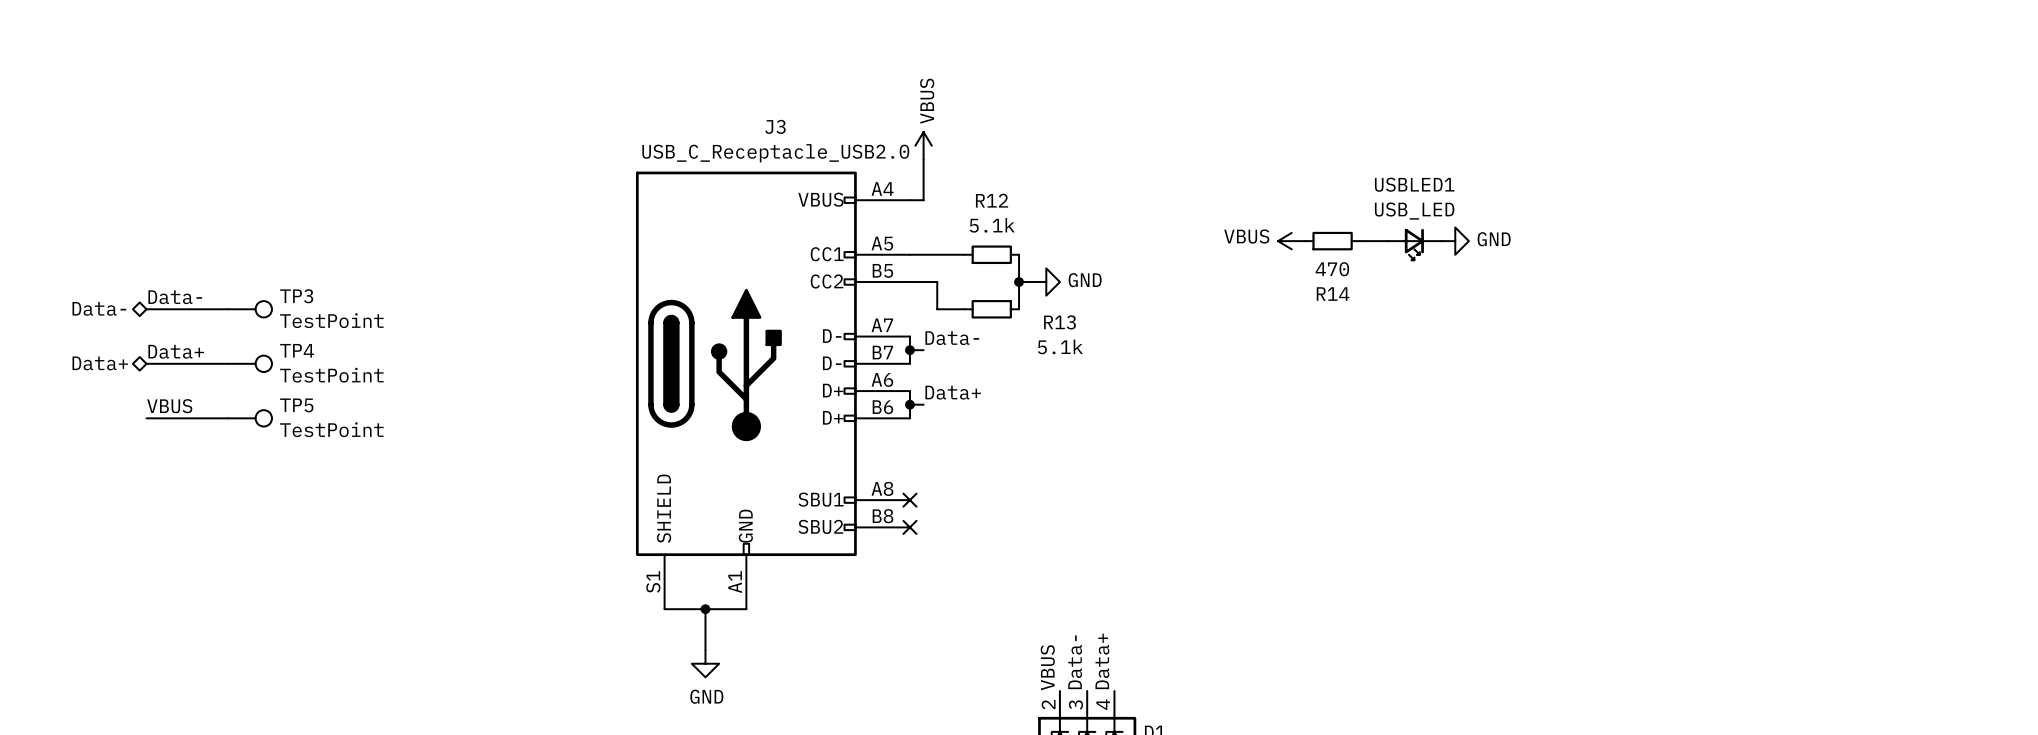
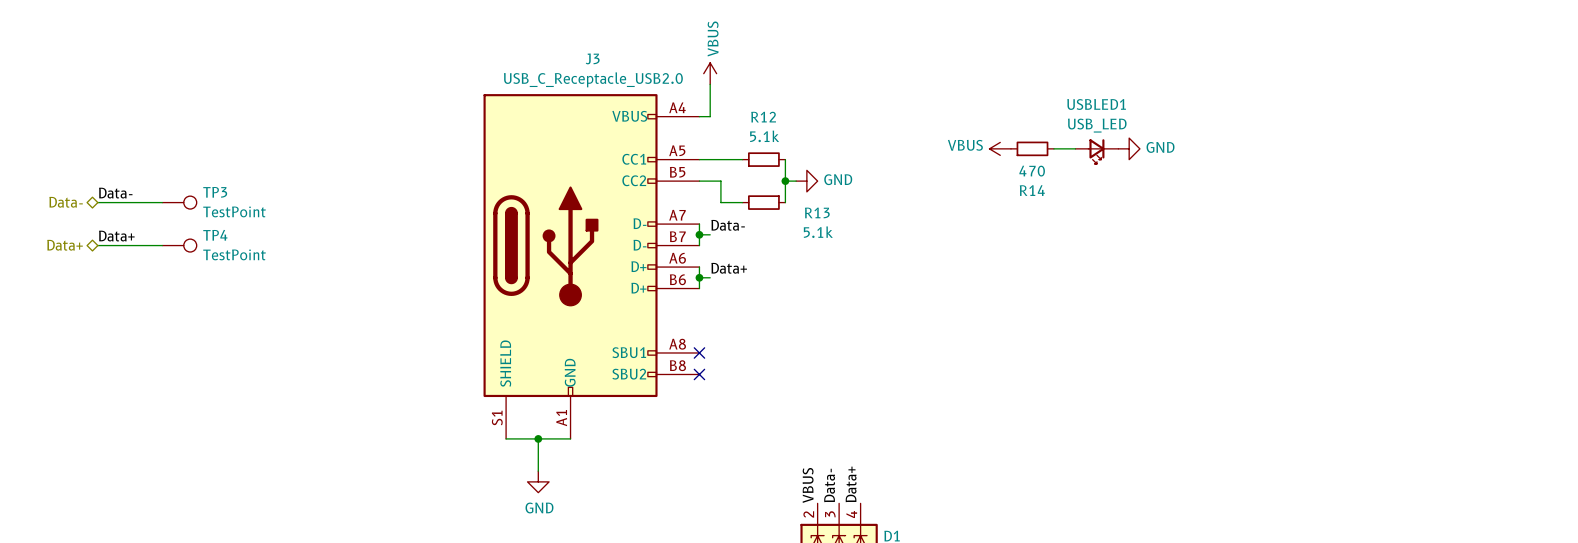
label: VBUS (169, 406) -> none
wire: (146, 418) (228, 418) -> none
TP5: TestPoint (250, 418) -> none

